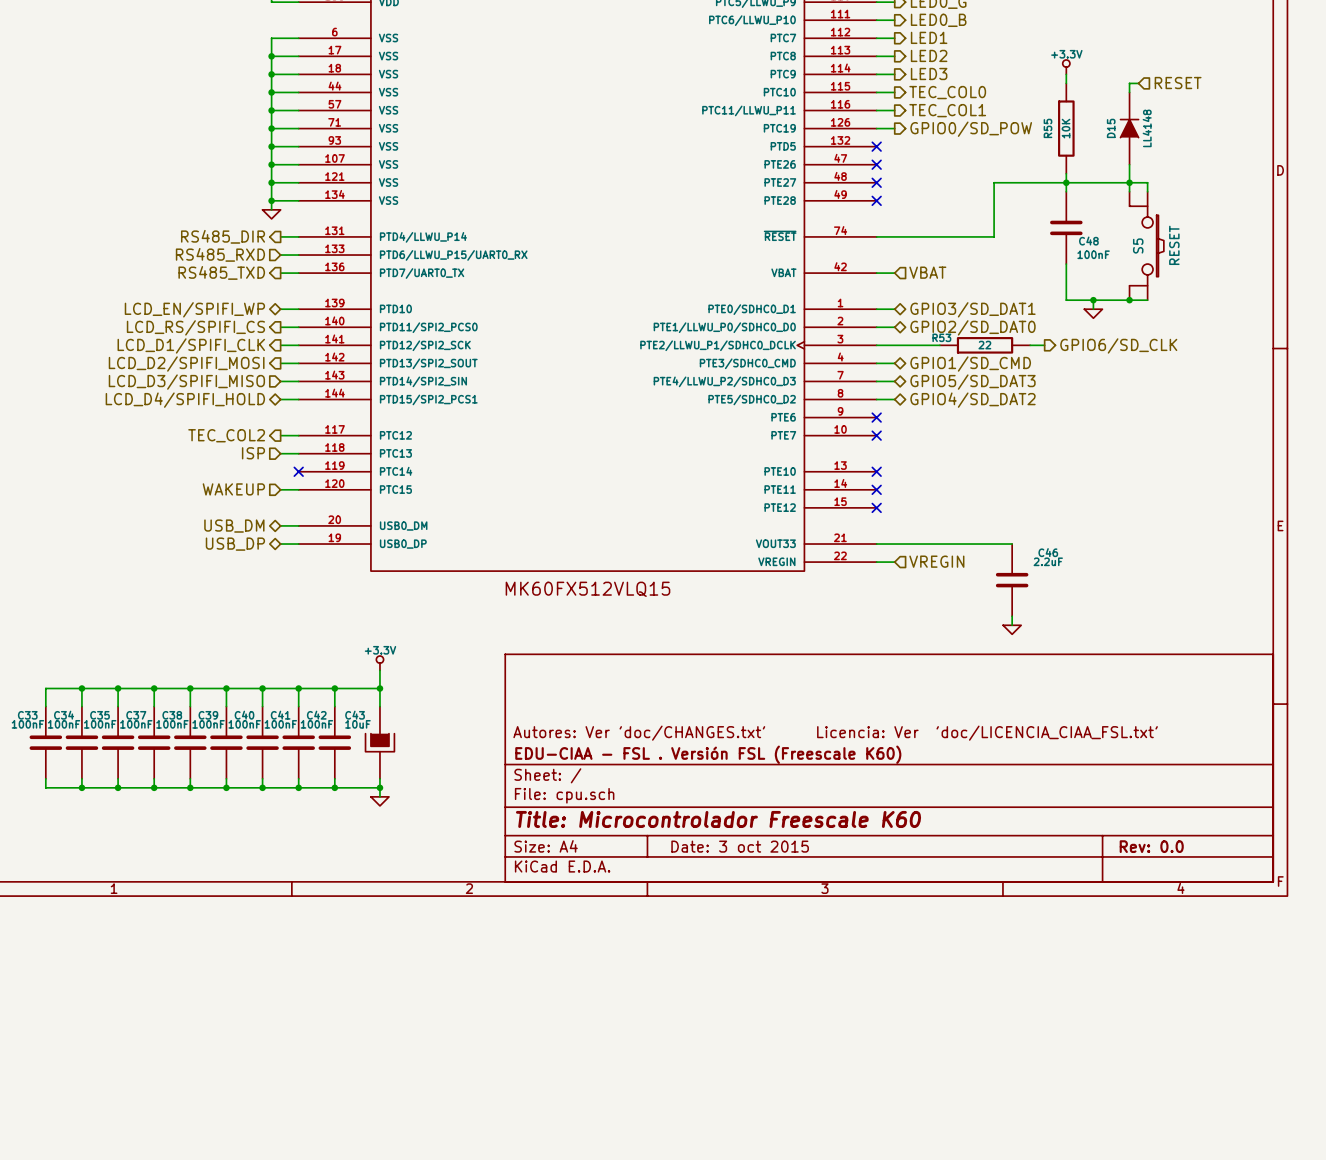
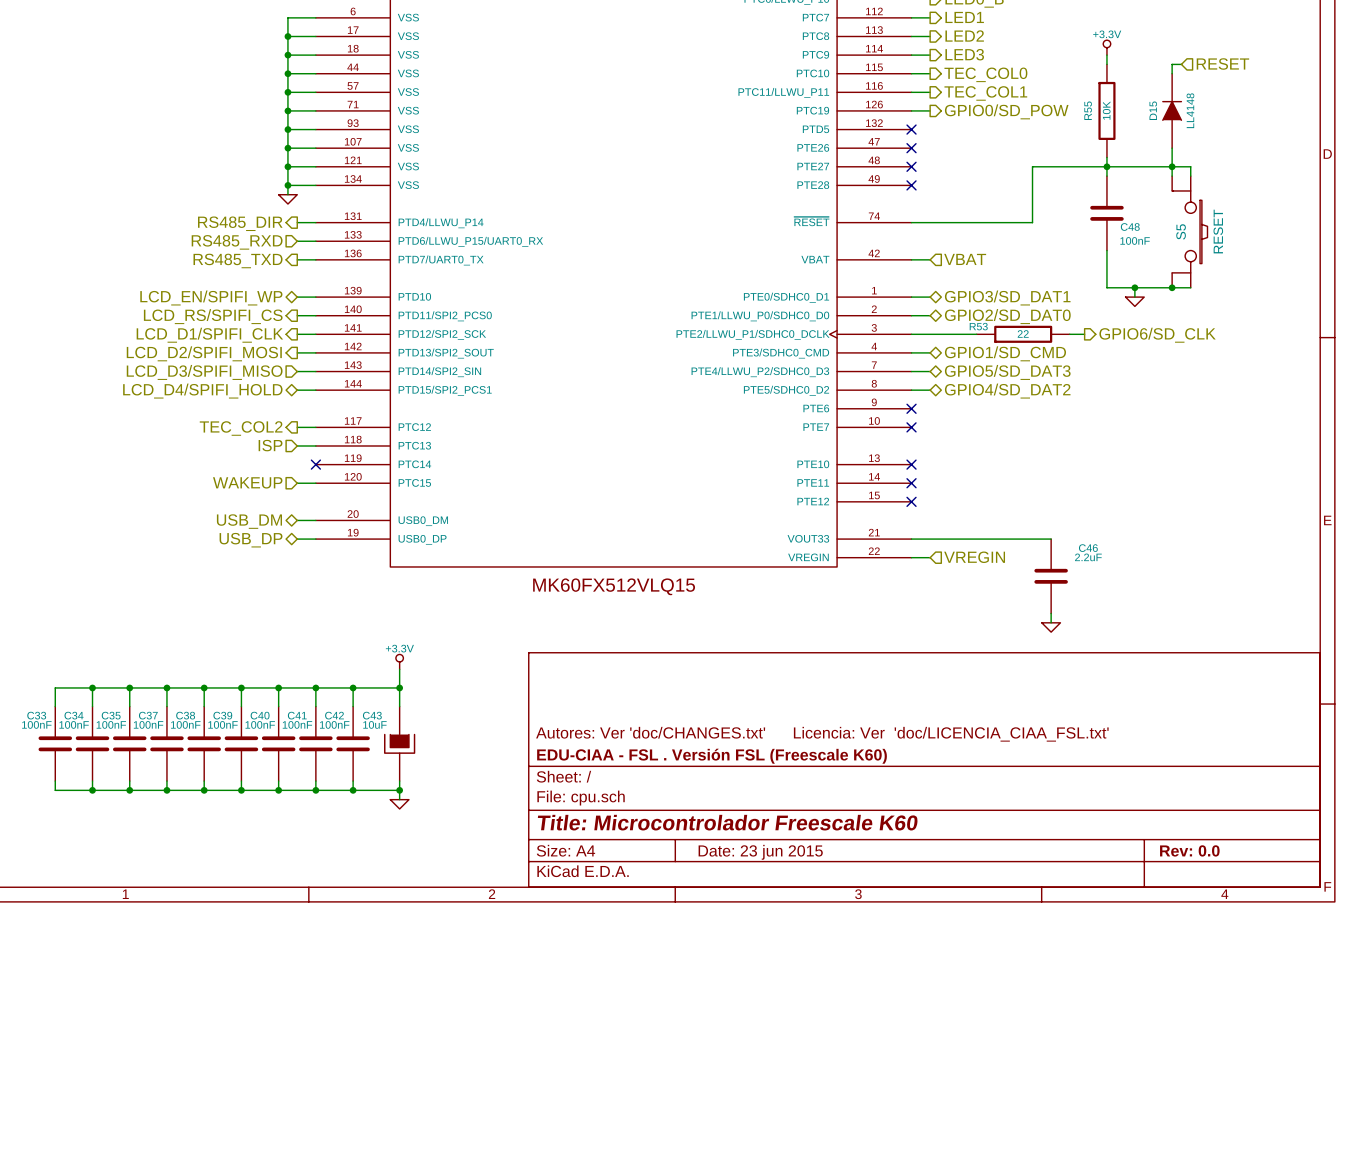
title block: Date: 3 oct 2015 (740, 846) -> Date: 23 jun 2015 (760, 852)

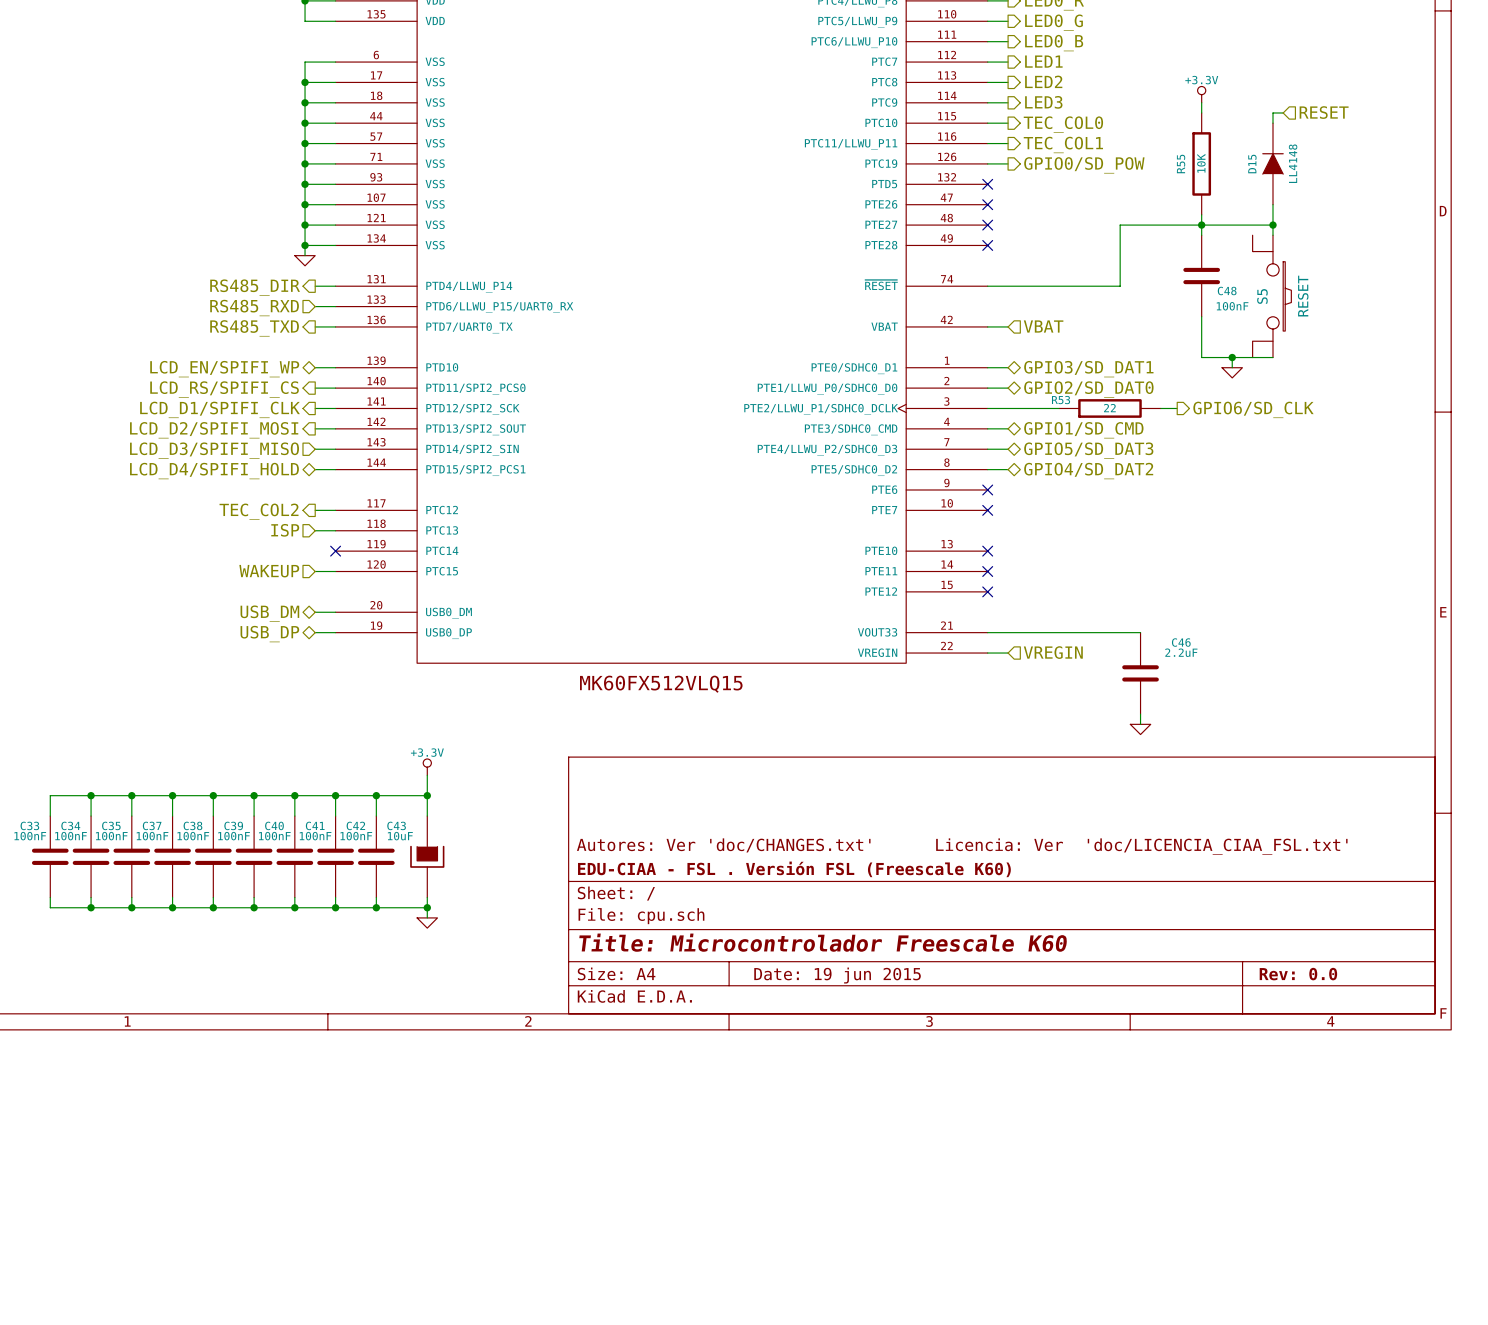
wire: (1172, 166) (1190, 166) (1190, 176) -> none
S5 position: (1189, 231) -> (1271, 296)
wire: (1172, 287) (1190, 287) -> none
junction: (1172, 287) -> none
title block: Date: 23 jun 2015 (760, 852) -> Date: 19 jun 2015 (837, 975)

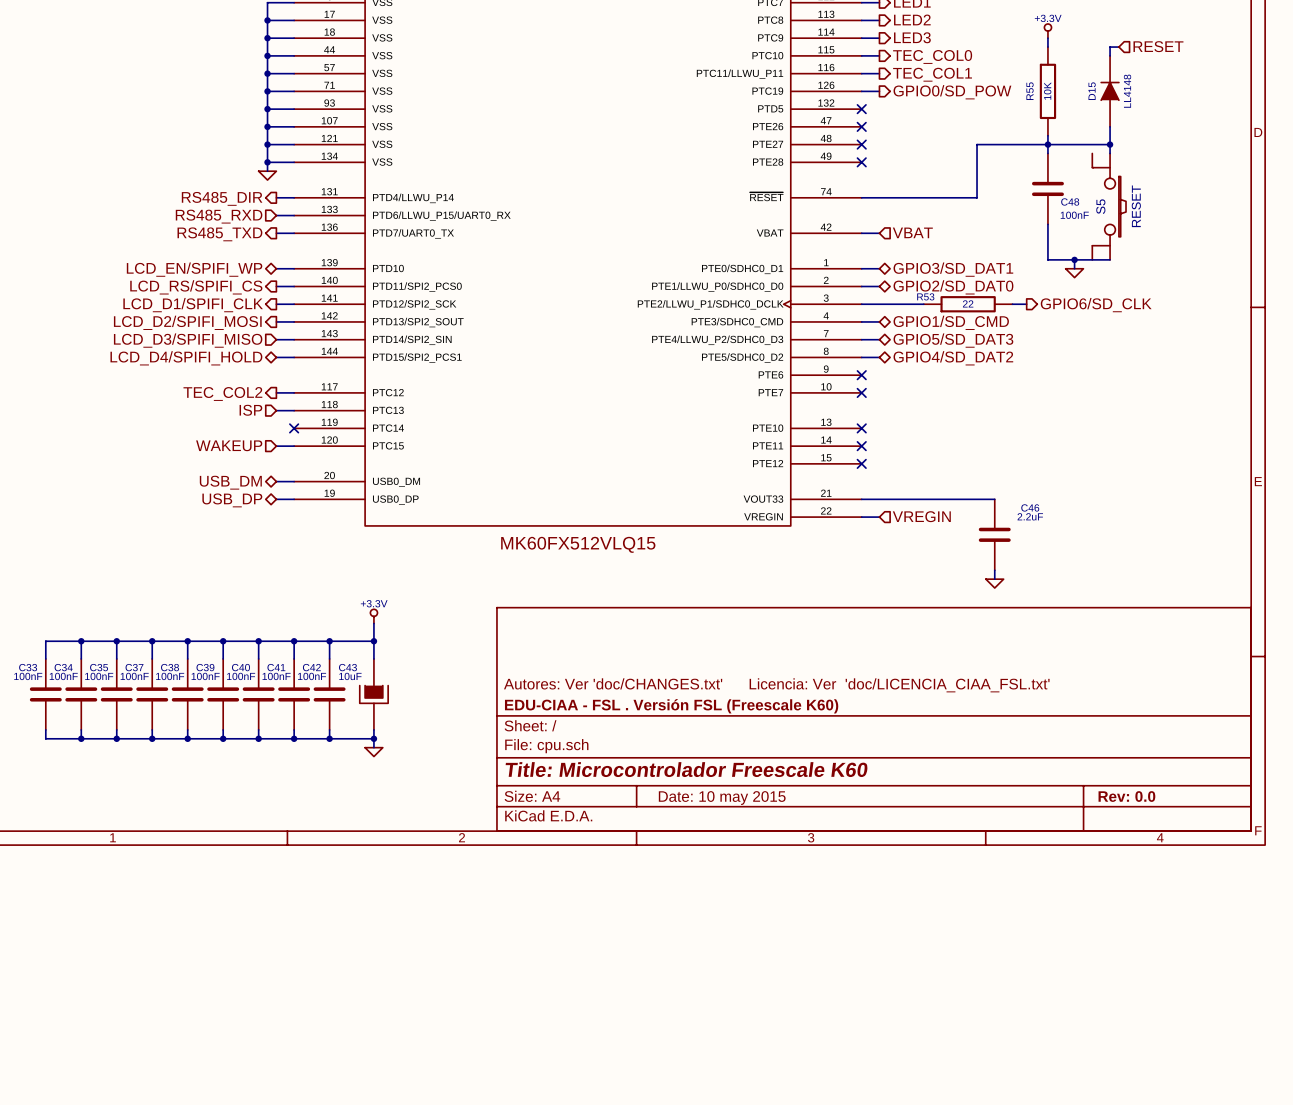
title block: Date: 19 jun 2015 (837, 975) -> Date: 10 may 2015 (722, 798)

